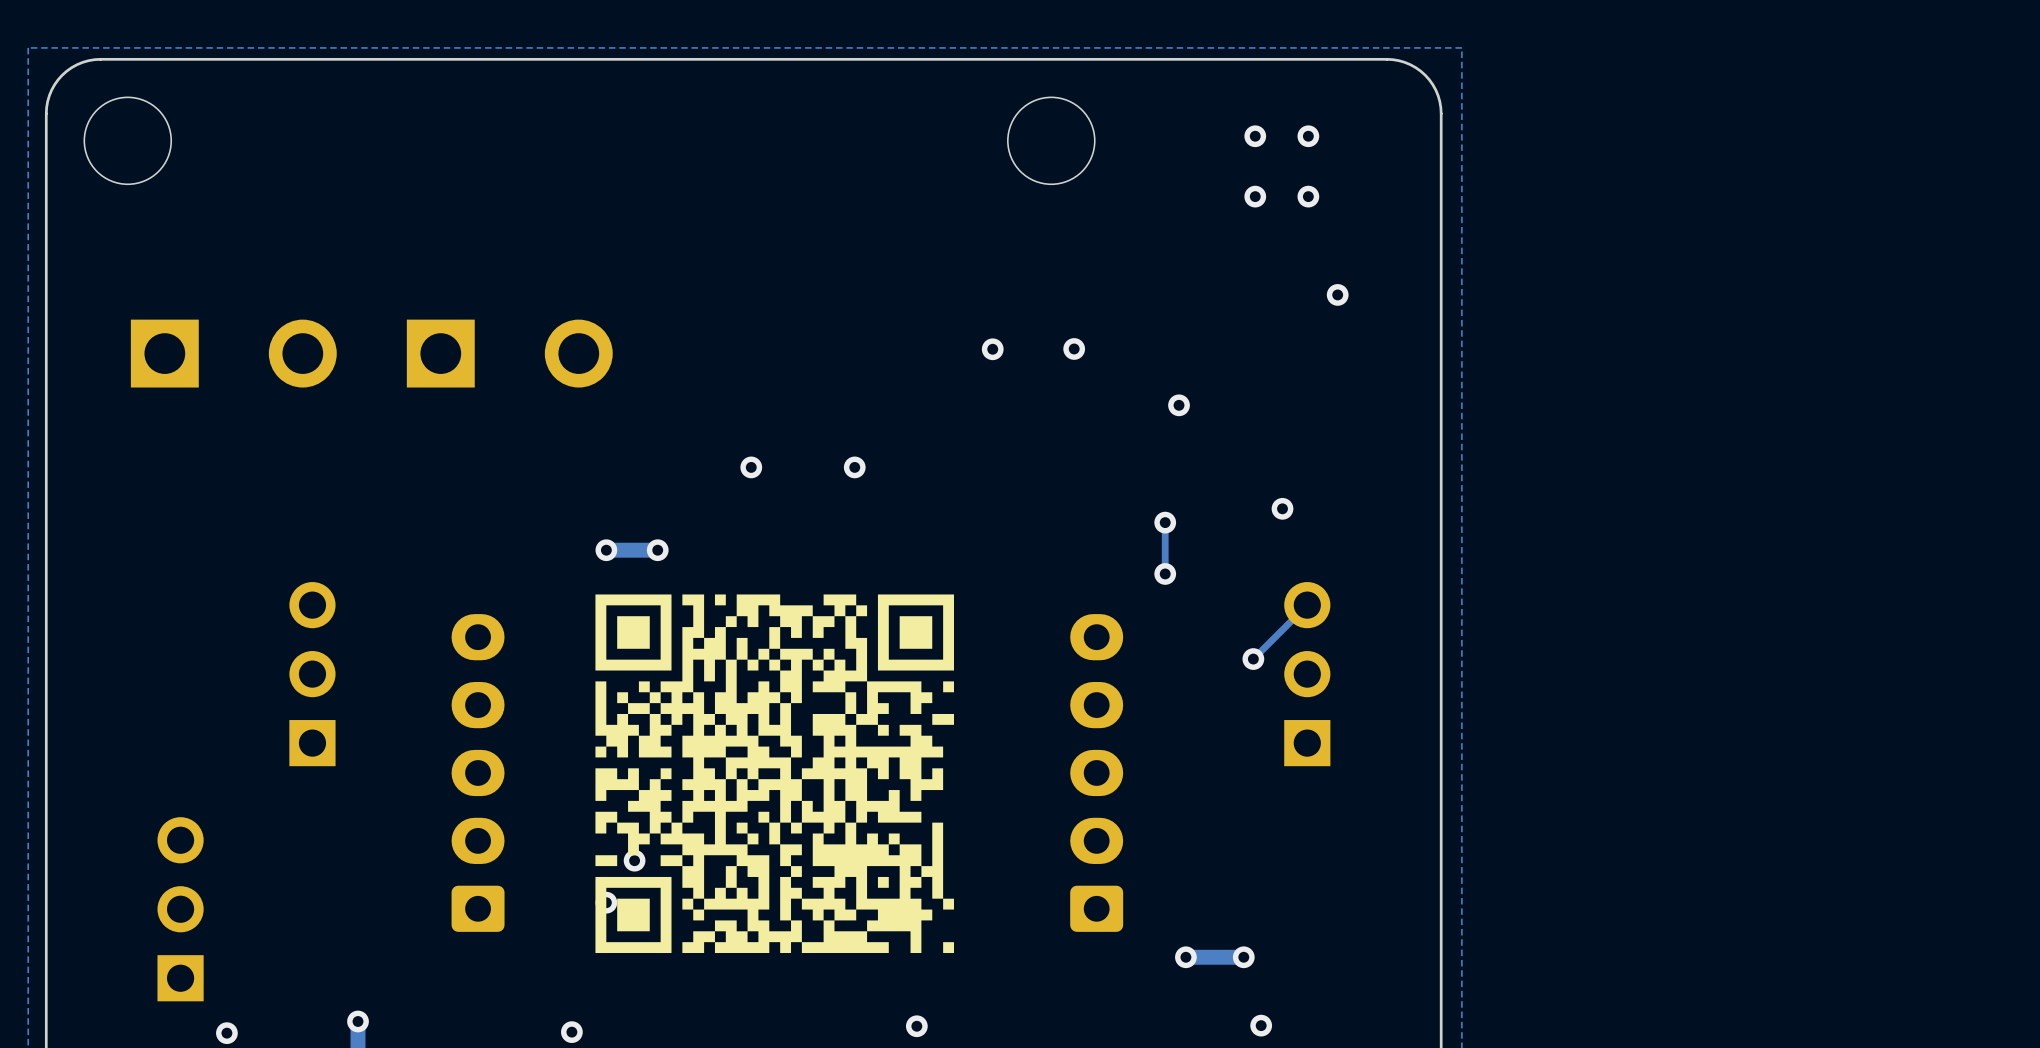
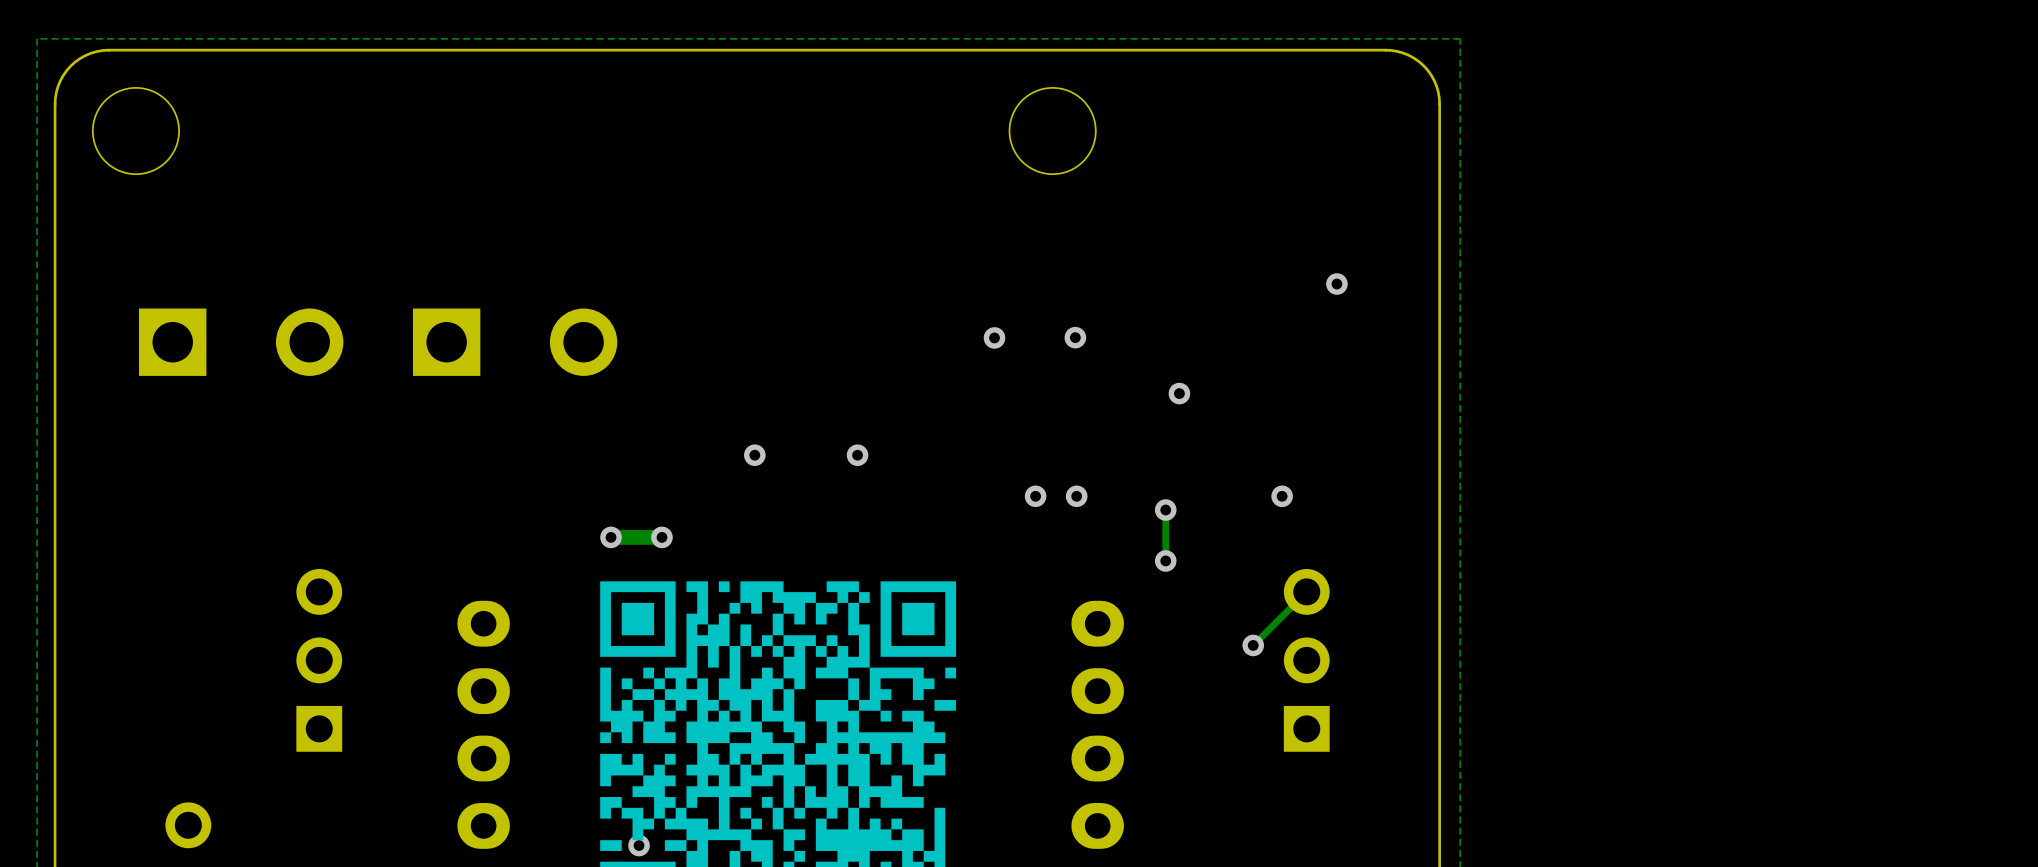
via: (1255, 136) -> none
via: (1308, 136) -> none
via: (1255, 196) -> none
via: (1308, 196) -> none
via: none -> (1035, 496)
via: none -> (1076, 496)

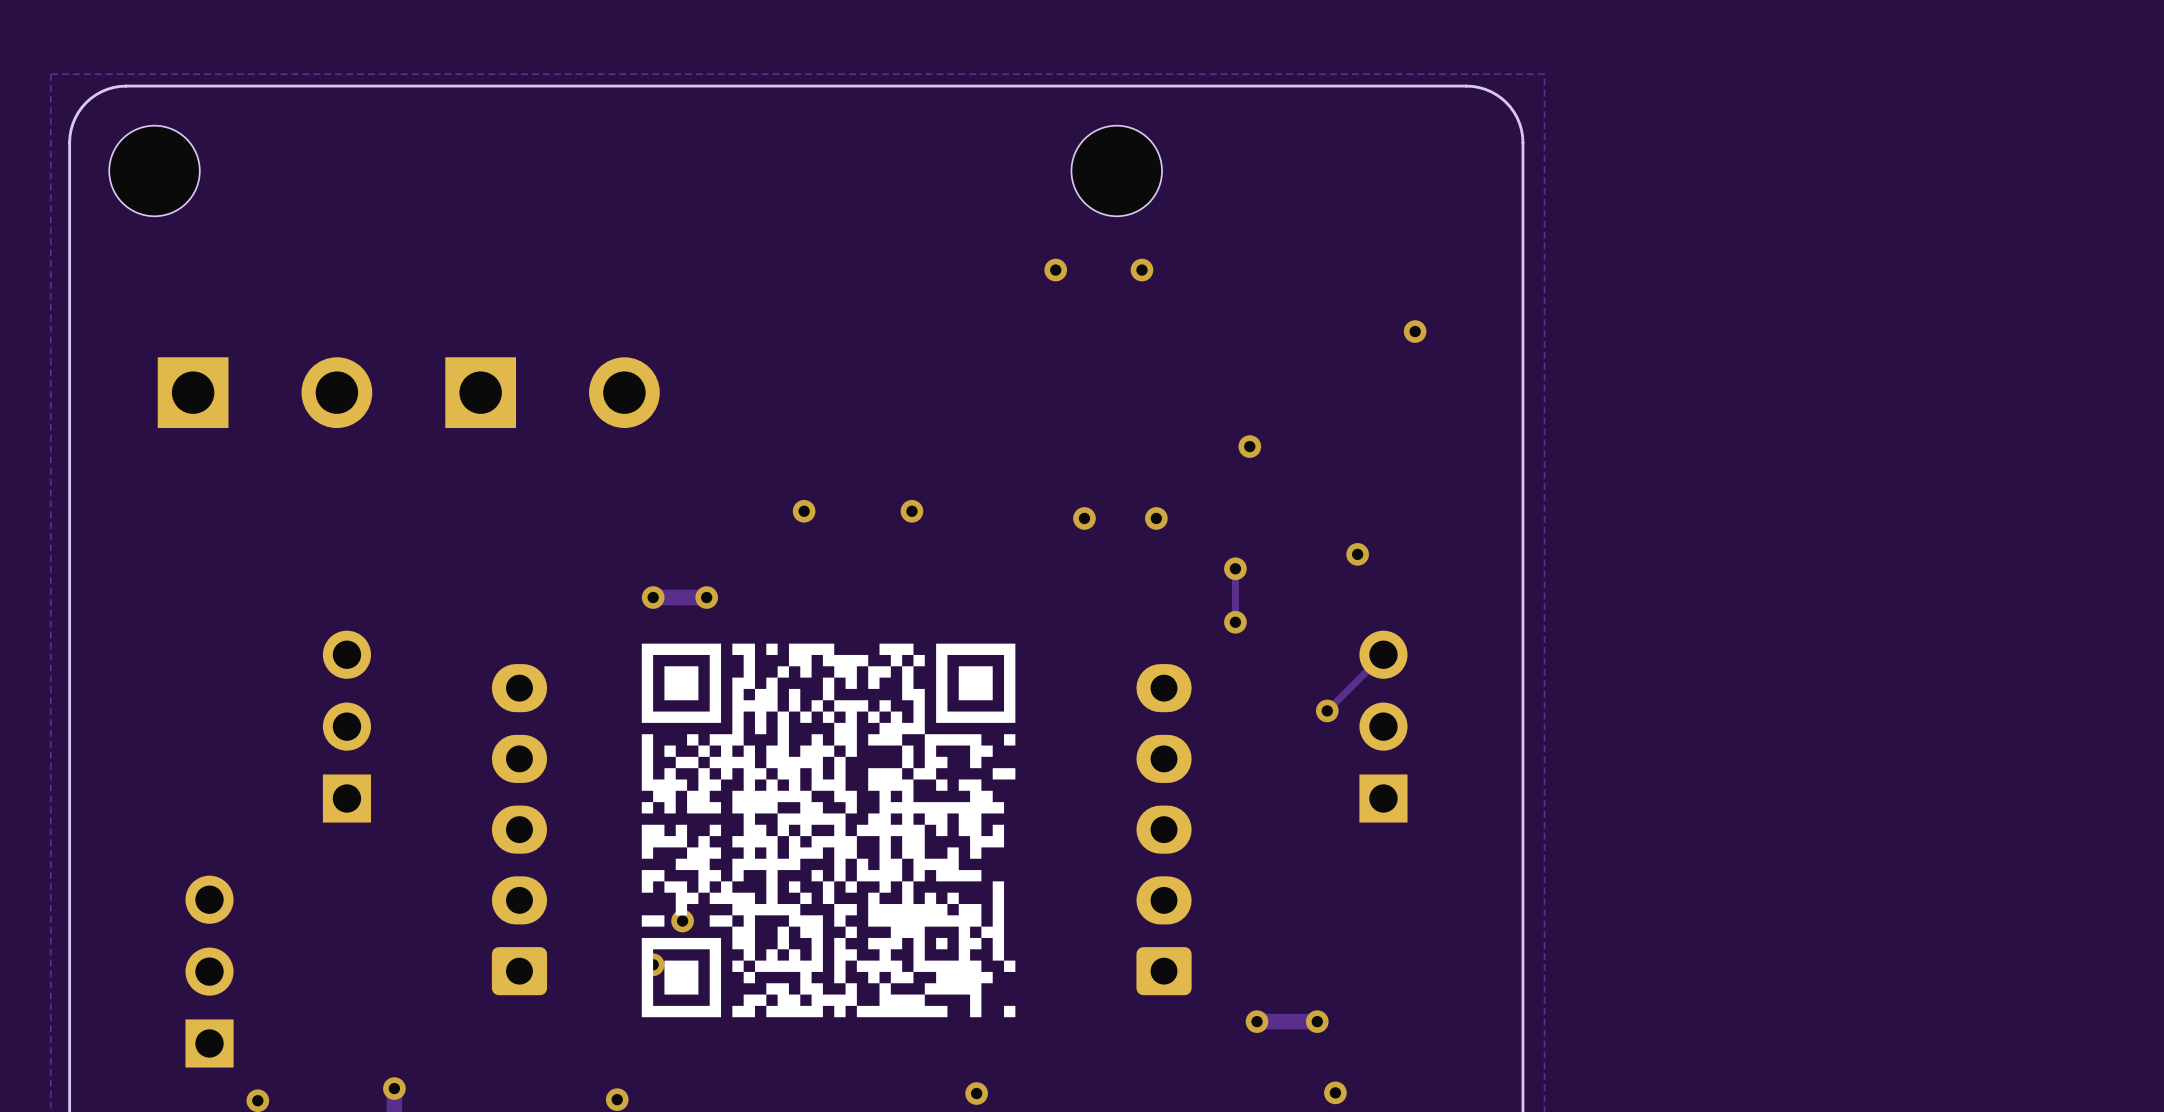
via: none -> (1055, 270)
via: none -> (1141, 270)
via: (994, 337) -> none
via: (1075, 337) -> none
via: none -> (1084, 518)
via: none -> (1156, 518)
via: (1035, 496) -> none
via: (1076, 496) -> none

